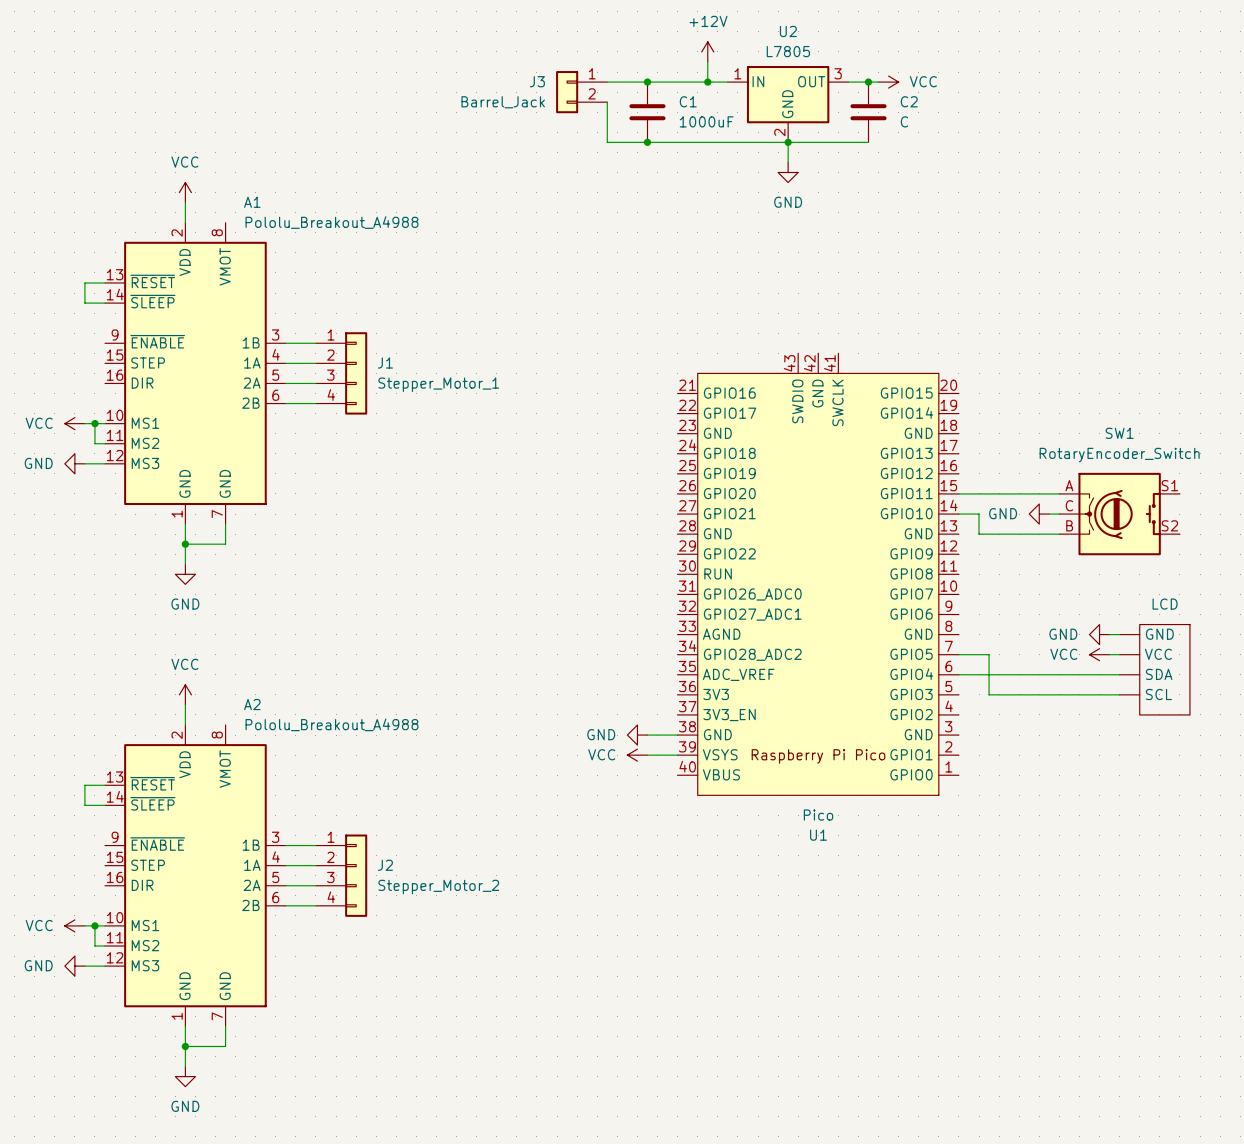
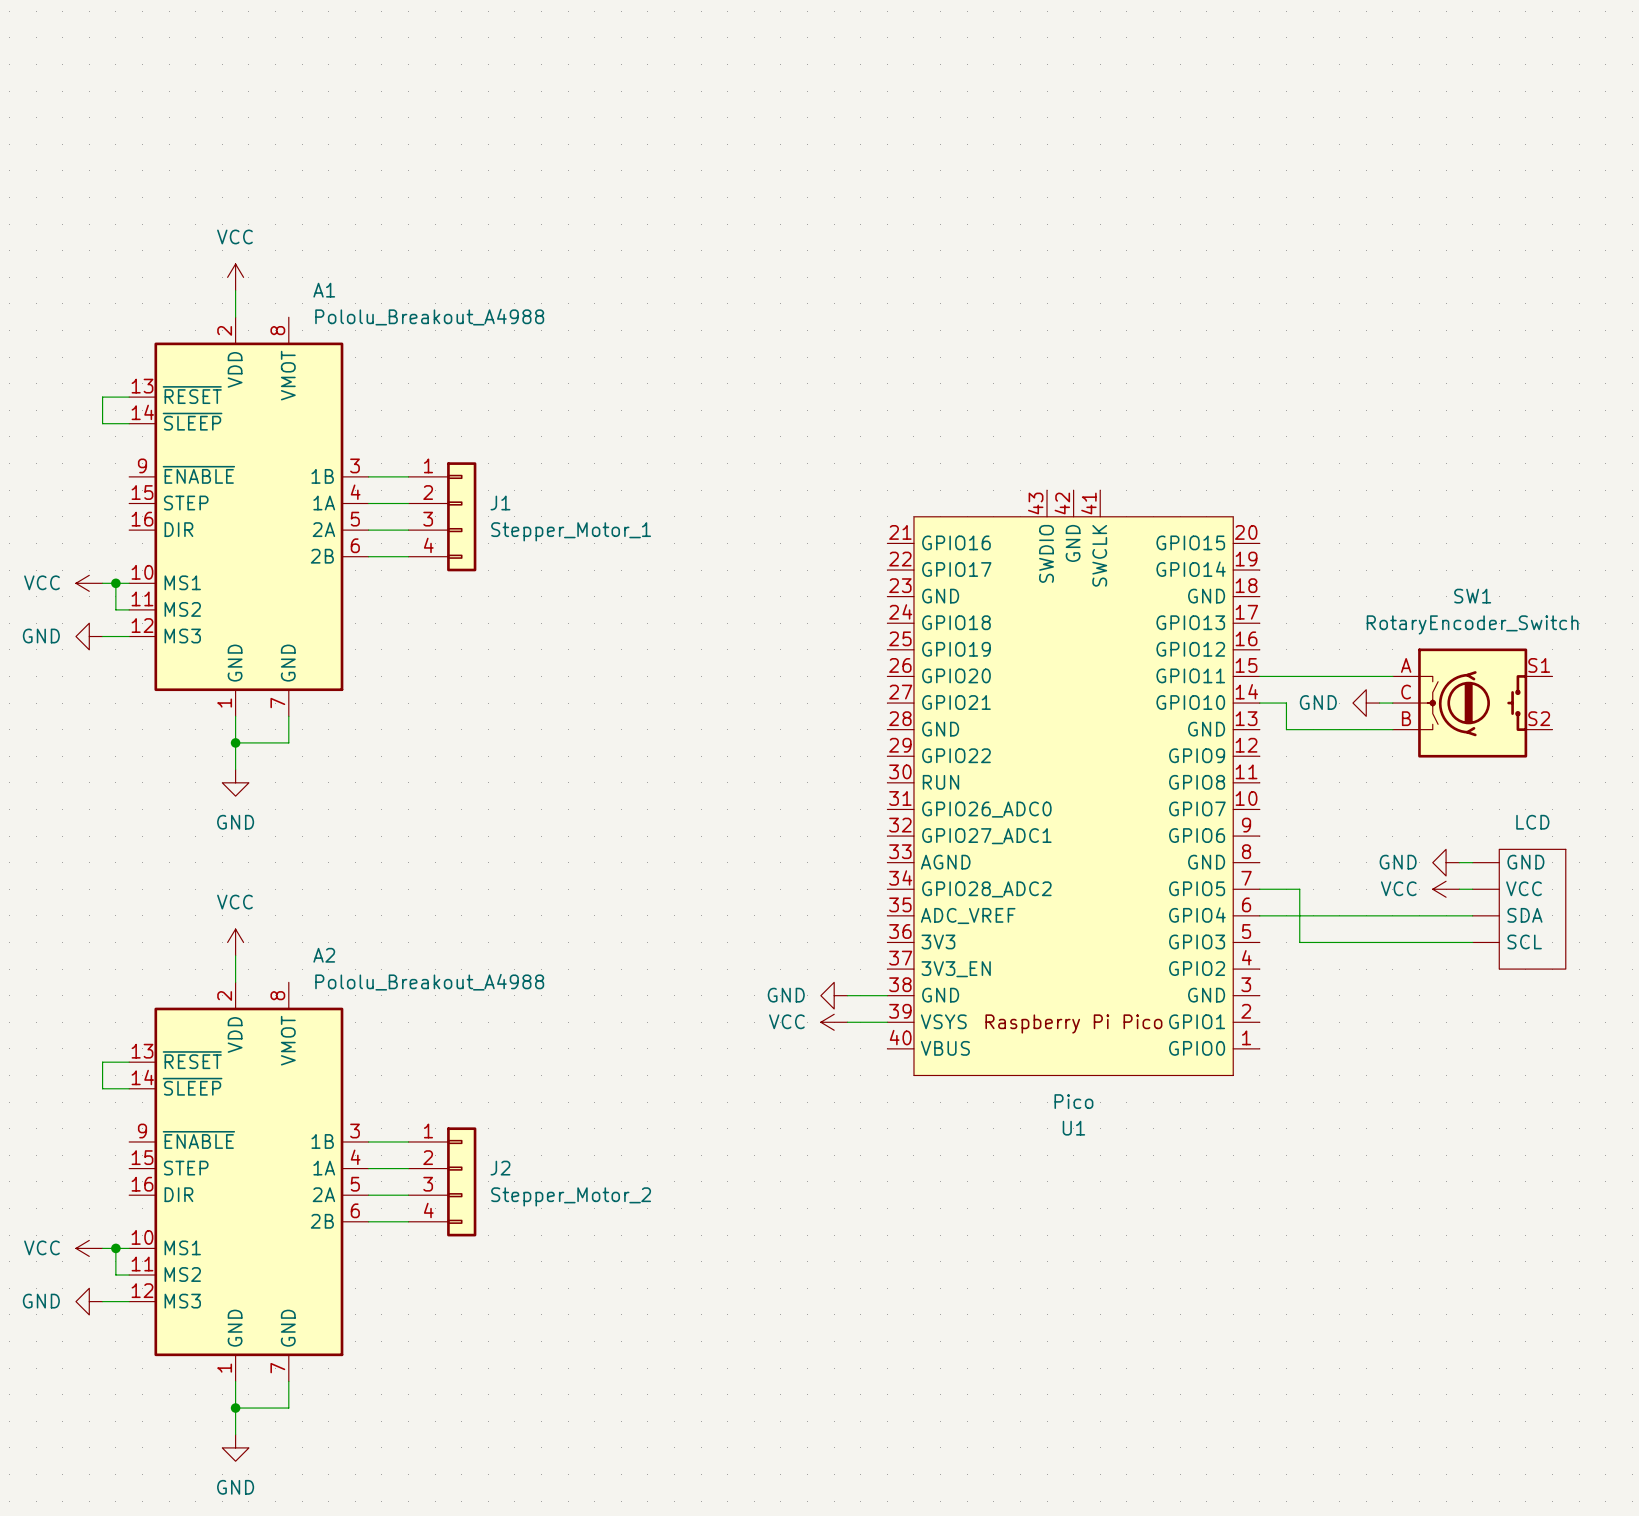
power symbol: +12V (707, 51) -> none
wire: (707, 61) (707, 82) -> none
wire: (607, 82) (727, 82) -> none
junction: (647, 82) -> none
junction: (707, 82) -> none
wire: (848, 82) (878, 82) -> none
junction: (868, 82) -> none
power symbol: VCC (888, 82) -> none
J3: Barrel_Jack (581, 92) -> none
wire: (607, 102) (607, 142) (868, 142) -> none
U2: L7805 (788, 104) -> none
C1: 1000uF (647, 112) -> none
C2: C (868, 112) -> none
junction: (647, 142) -> none
wire: (788, 142) (788, 162) -> none
junction: (788, 142) -> none
power symbol: GND (788, 172) -> none

